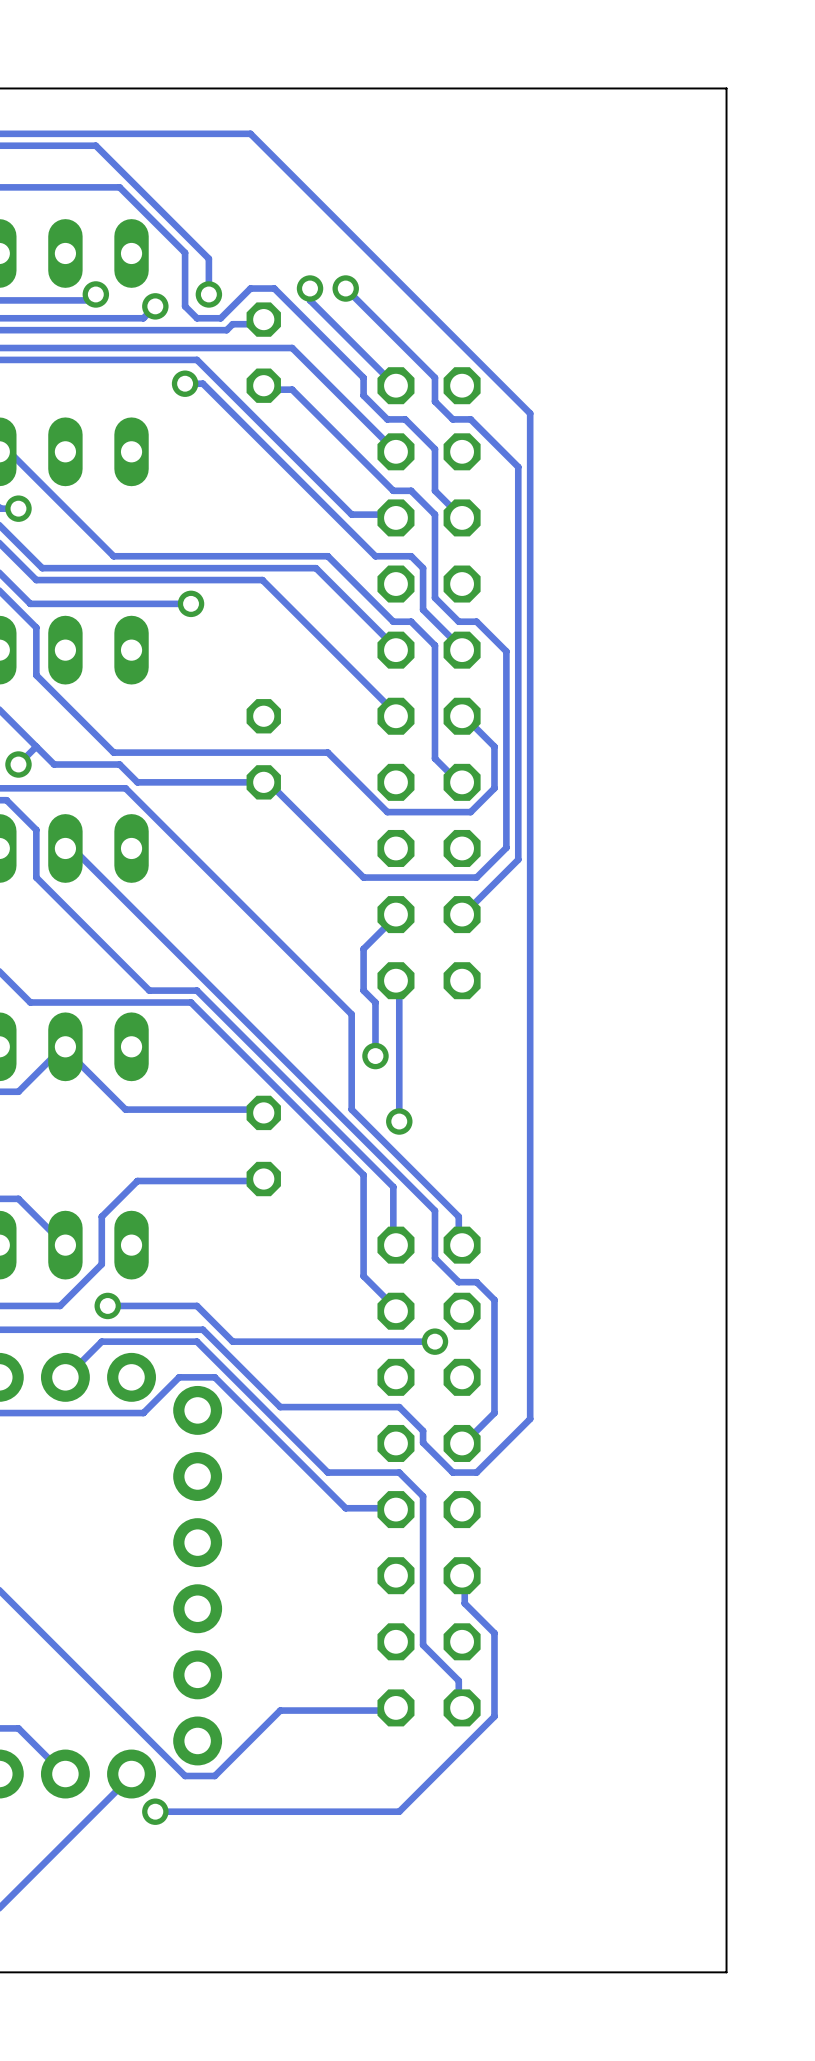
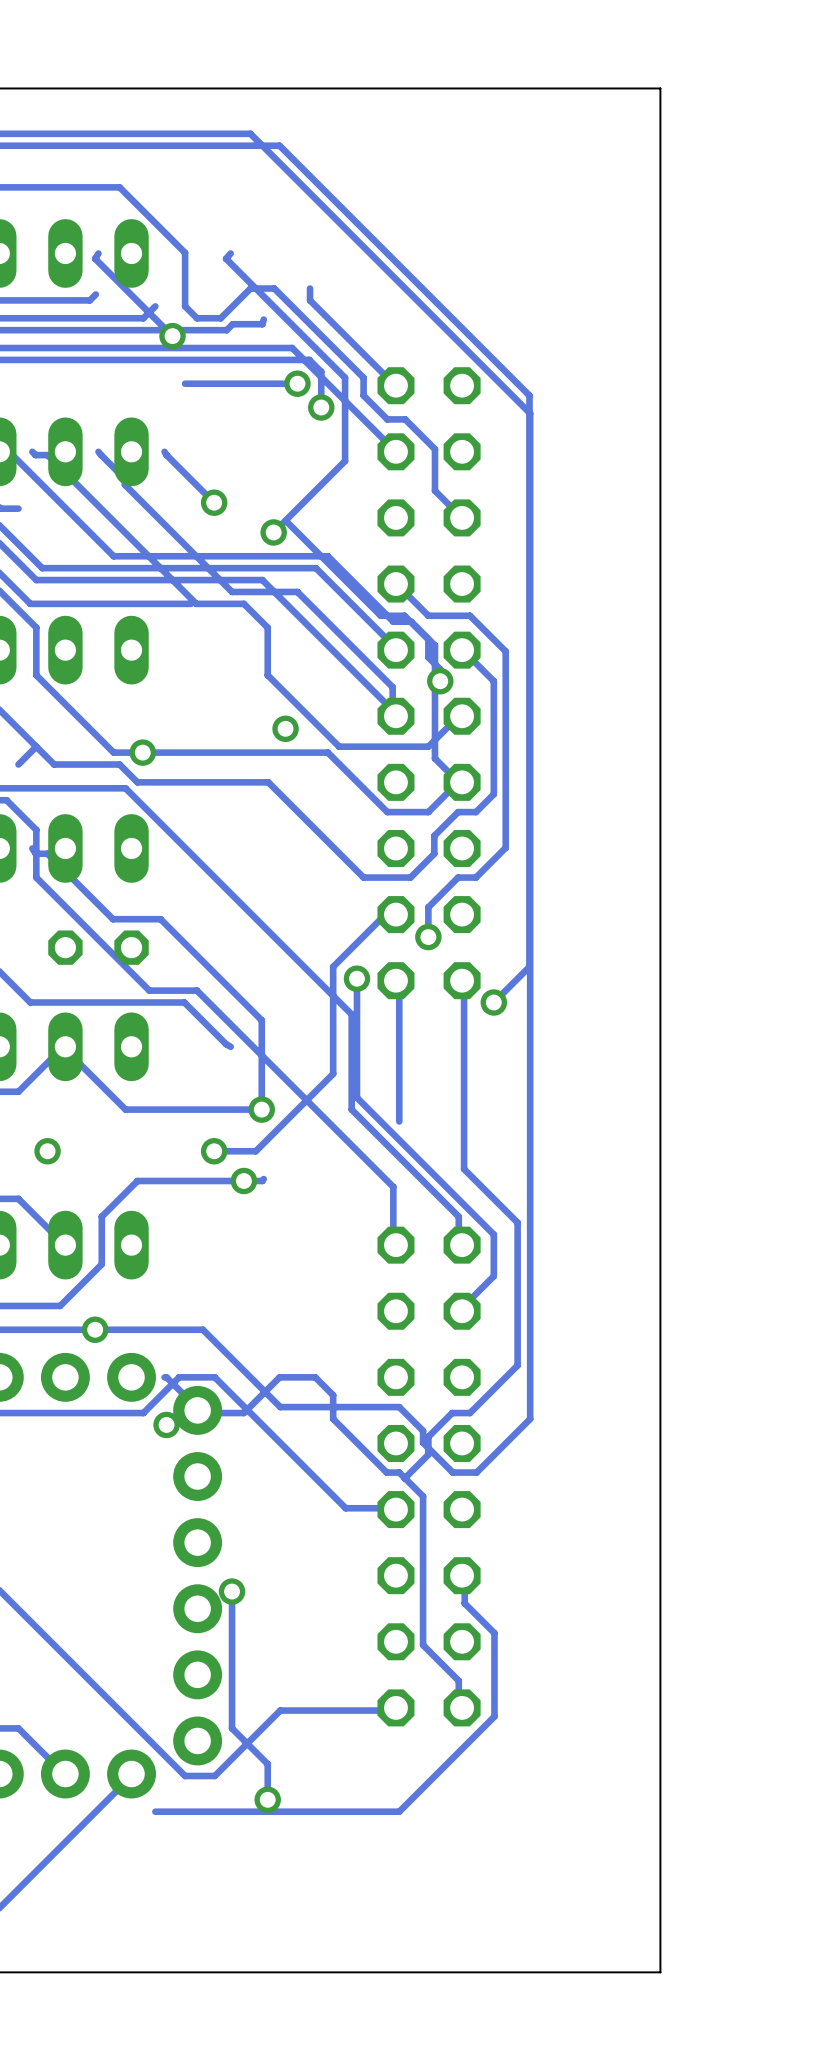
board edge: (660, 88) (726, 88) (726, 1972) (660, 1972) -> (660, 88) (660, 1972)
track: (95, 145) (208, 258) (208, 294) -> (95, 145) (279, 145) (529, 395) (529, 966) (493, 1002)
track: none -> (98, 253) (95, 258) (172, 336)
track: none -> (230, 253) (226, 258) (345, 377) (345, 461) (273, 532)
via: (310, 288) -> none
track: (345, 288) (434, 377) (434, 401) (452, 419) (470, 419) (518, 467) (518, 859) (462, 914) -> none
via: (345, 288) -> none
via: (95, 294) -> none
via: (208, 294) -> none
via: (155, 306) -> none
via: none -> (172, 336)
part: (263, 352) -> none
track: (196, 359) (351, 514) (393, 514) (395, 517) -> (196, 359) (309, 359) (321, 371) (321, 407)
via: (185, 383) -> none
track: (202, 383) (375, 556) (411, 556) (423, 568) (423, 609) (462, 650) -> (202, 383) (297, 383)
via: none -> (297, 383)
track: (263, 385) (268, 389) (292, 389) (393, 490) (411, 490) (434, 514) (434, 597) (458, 621) (476, 621) (506, 651) (506, 847) (475, 877) -> (395, 584) (428, 615) (470, 615) (505, 651) (505, 847) (475, 877)
via: none -> (321, 407)
track: none -> (32, 451) (35, 455) (47, 455) (196, 603) (243, 603) (267, 627) (267, 675) (339, 746) (428, 746) (458, 716) (462, 716)
track: none -> (98, 451) (124, 478) (124, 484) (232, 591) (297, 591) (392, 687) (392, 710) (395, 716)
track: none -> (164, 451) (214, 502)
via: none -> (214, 502)
via: (18, 508) -> none
track: none -> (285, 520) (380, 615) (404, 615) (428, 639) (428, 657) (440, 669) (440, 681)
via: none -> (273, 532)
via: (191, 603) -> none
via: none -> (440, 681)
track: (462, 716) (494, 746) (494, 788) (470, 812) -> (462, 650) (493, 681) (493, 794) (475, 812) (470, 812)
via: none -> (285, 728)
part: (263, 749) -> none
via: none -> (142, 752)
via: (18, 764) -> none
track: (458, 812) (428, 812) -> (458, 782) (428, 812)
track: none -> (458, 812) (434, 835) (434, 853) (410, 877)
track: none -> (32, 848) (35, 853) (47, 853) (113, 919) (160, 919) (261, 1020) (261, 1109)
track: (65, 848) (66, 853) (77, 853) (434, 1210) (434, 1258) (458, 1282) (476, 1282) (494, 1300) (494, 1413) (462, 1443) -> none
track: (458, 877) (410, 877) -> (458, 877) (428, 907) (428, 937)
track: (395, 914) (363, 948) (363, 990) (375, 1002) (375, 1056) -> (395, 914) (392, 919) (380, 919) (333, 966) (333, 1073) (255, 1151) (214, 1151)
via: none -> (428, 937)
part: none -> (98, 947)
track: none -> (356, 978) (356, 1097) (493, 1234) (493, 1276) (464, 1305) (462, 1311)
via: none -> (356, 978)
track: none -> (462, 980) (464, 984) (464, 1169) (517, 1222) (517, 1365) (470, 1413) (452, 1413) (428, 1436) (428, 1454) (404, 1478)
track: (184, 1002) (191, 1002) (363, 1175) (363, 1276) (393, 1305) (395, 1311) -> (184, 1002) (230, 1046)
via: none -> (493, 1002)
via: (375, 1056) -> none
via: none -> (261, 1109)
via: (399, 1121) -> none
part: (263, 1145) -> none
via: none -> (47, 1151)
via: none -> (214, 1151)
via: none -> (243, 1181)
track: (107, 1305) (196, 1305) (232, 1341) (434, 1341) -> none
via position: (107, 1305) -> (95, 1329)
via: (434, 1341) -> none
track: (65, 1377) (101, 1341) (196, 1341) (327, 1472) (386, 1472) -> (164, 1377) (202, 1413) (243, 1413) (279, 1377) (315, 1377) (333, 1395) (333, 1419) (386, 1472)
via: none -> (166, 1424)
track: none -> (232, 1591) (232, 1728) (267, 1764) (267, 1799)
via: none -> (232, 1591)
via position: (155, 1811) -> (267, 1799)

